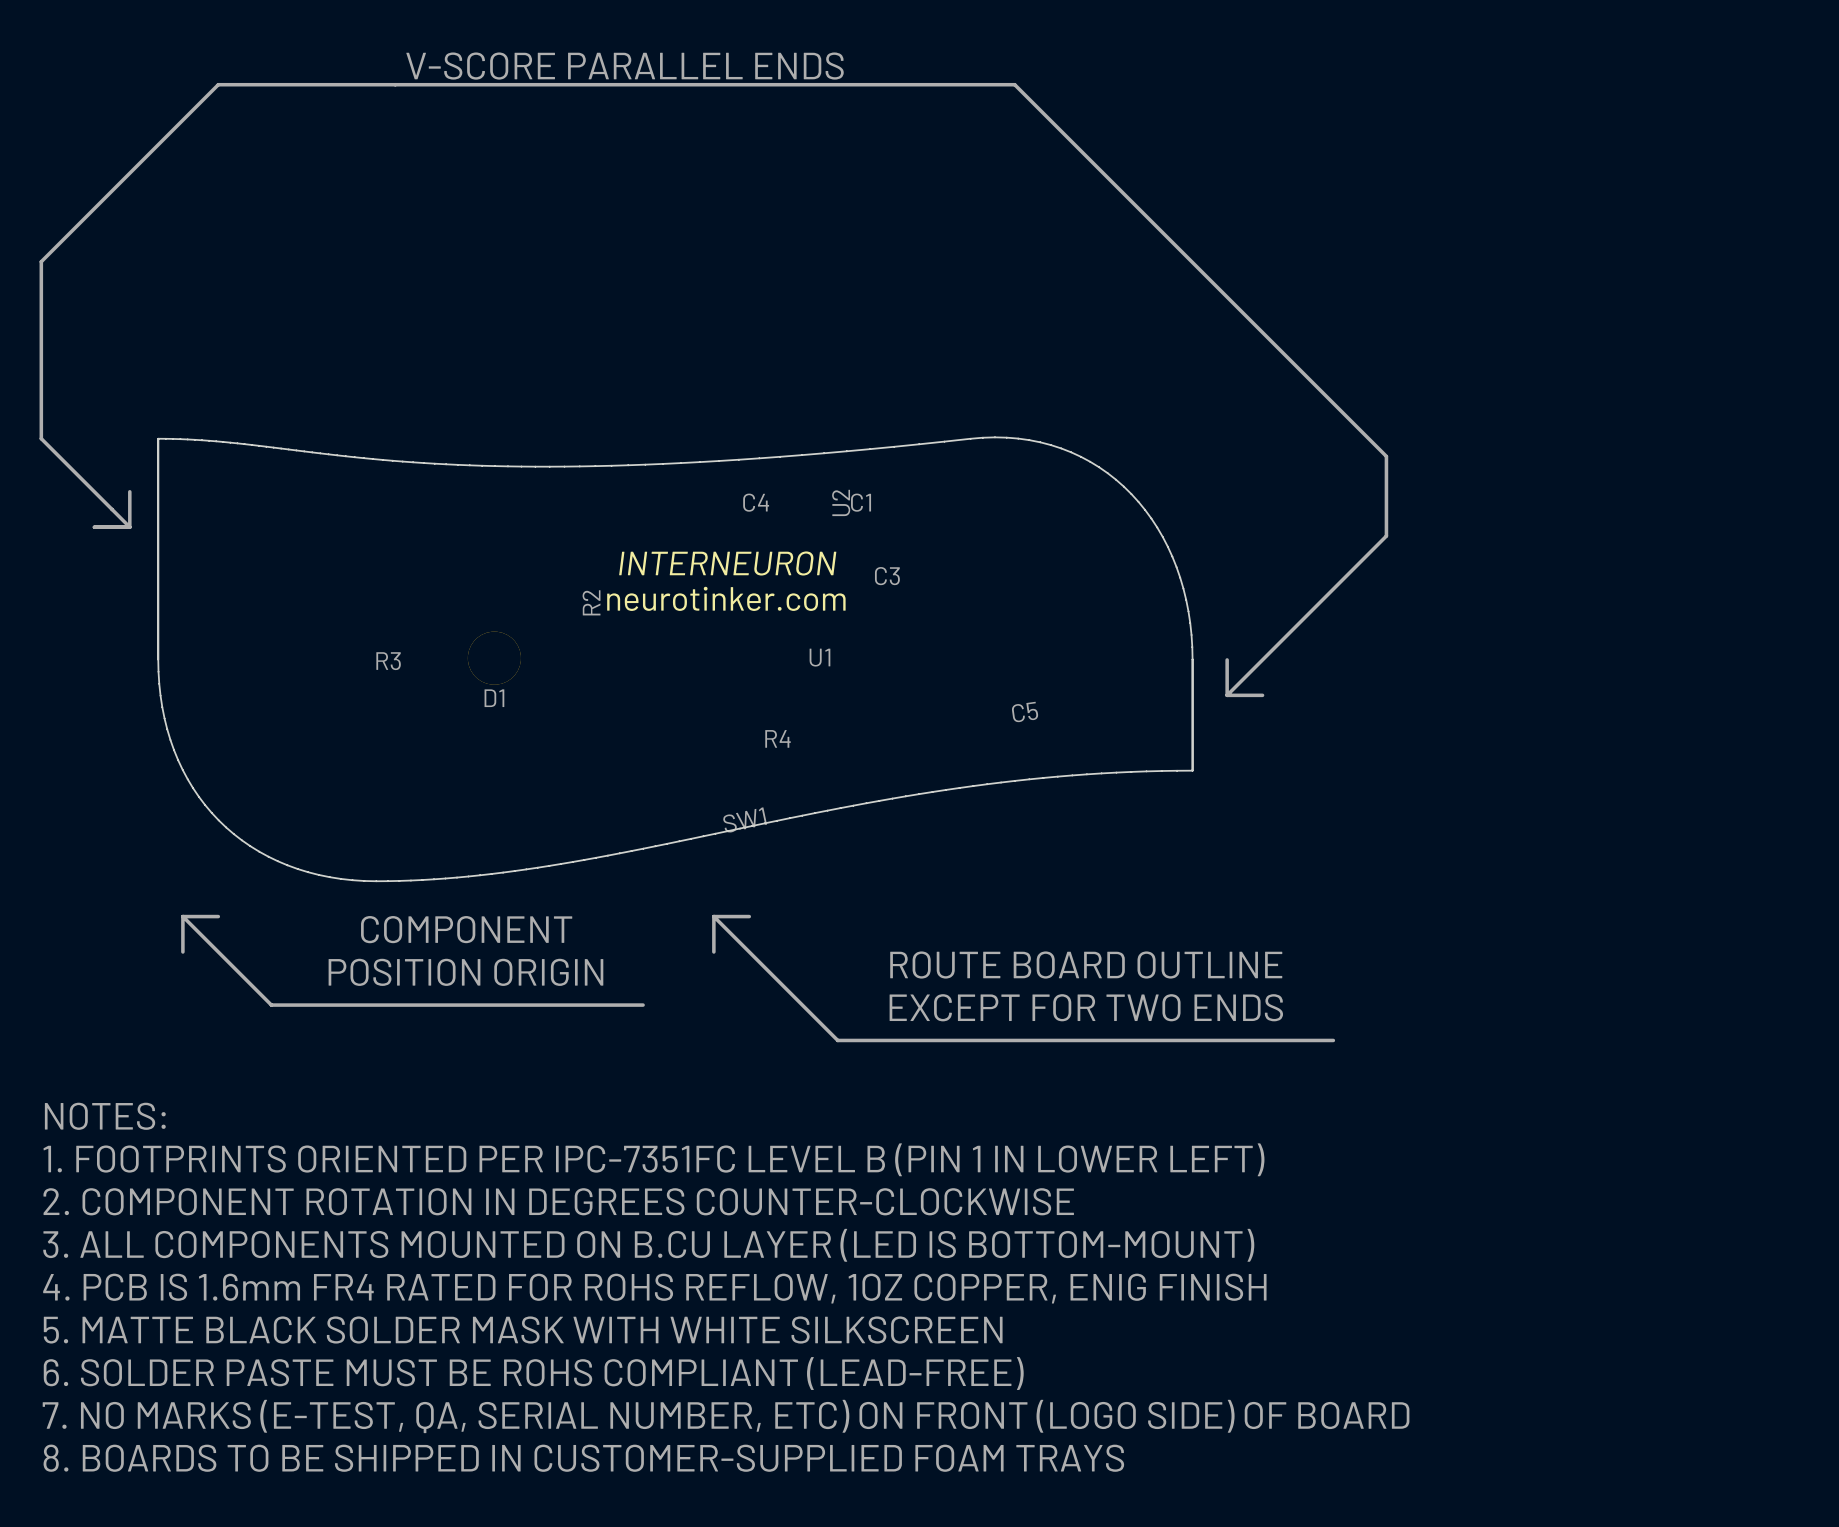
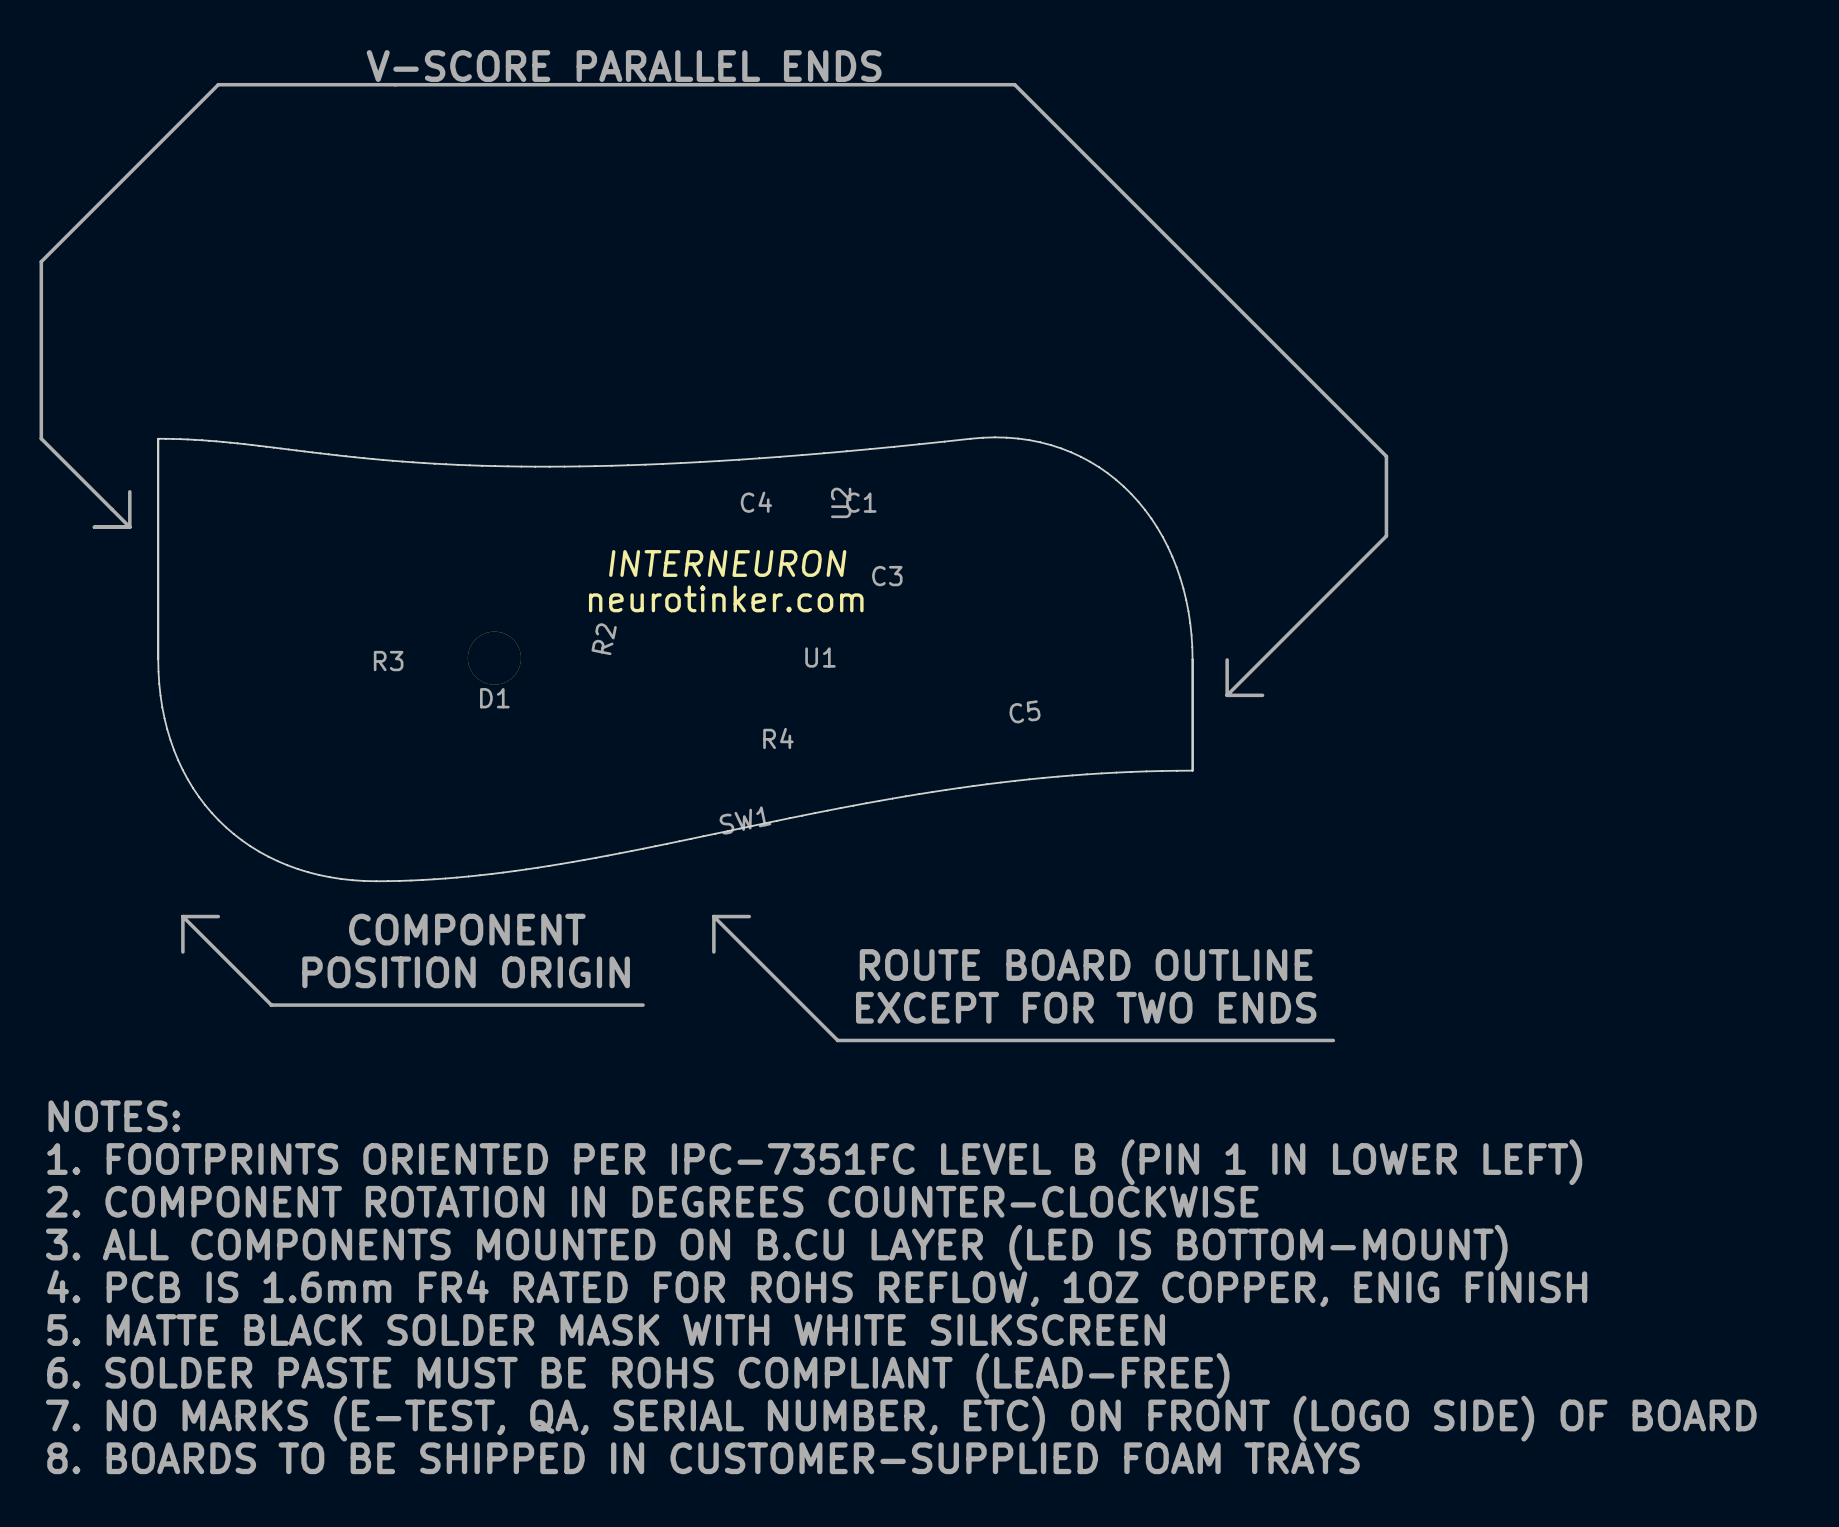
R2 position: (591, 602) -> (604, 639)
R2 name rotation: 0° (591, 602) -> 11.3° clockwise (604, 639)

